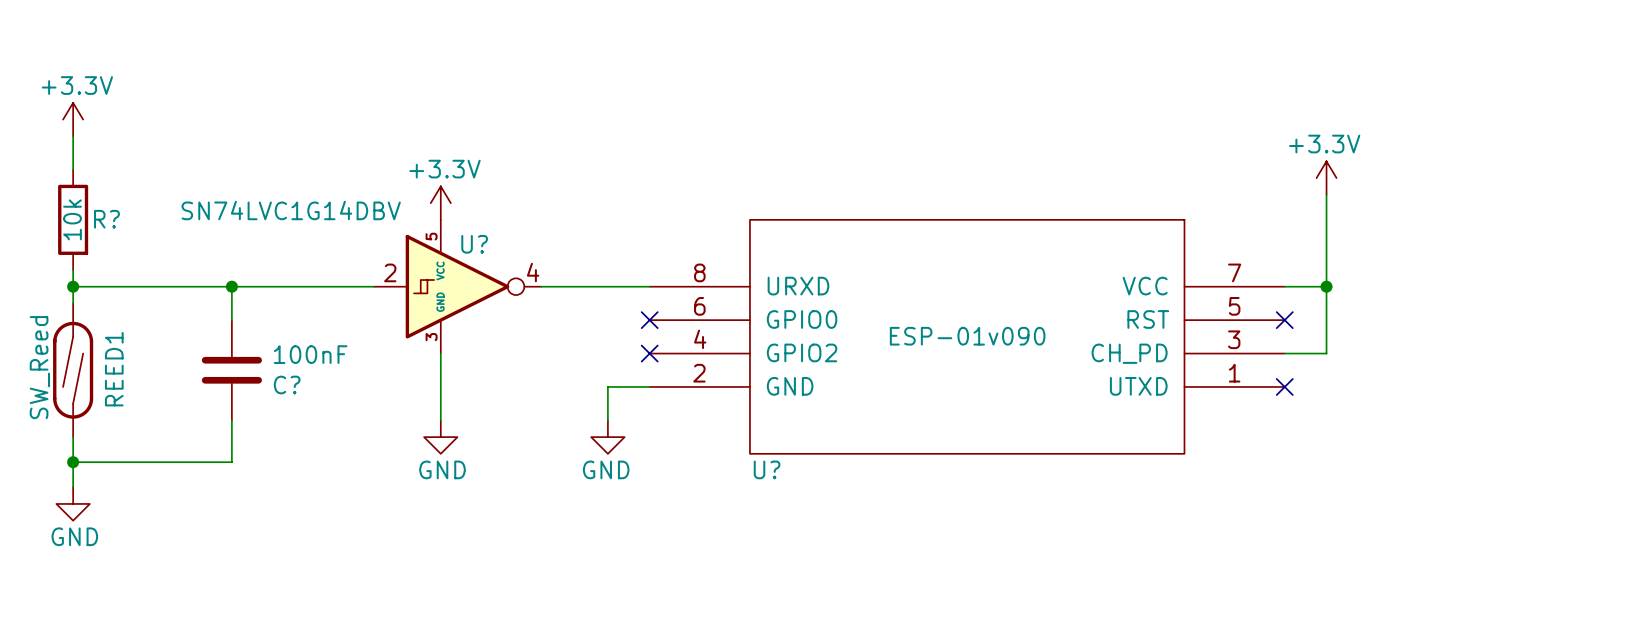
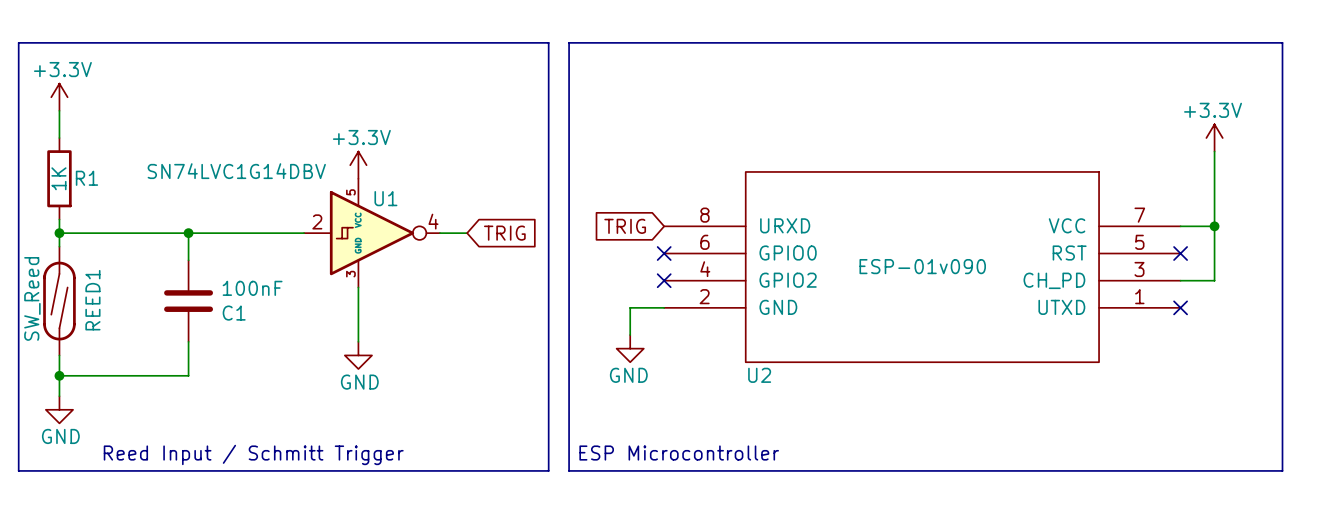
line: none -> (18, 42) (18, 470) (548, 470) (548, 42) (18, 42)
line: none -> (569, 42) (569, 470) (1282, 470) (1282, 42) (569, 42)
power symbol position: +3.3V (1326, 178) -> +3.3V (1214, 138)
wire: (1326, 194) (1326, 353) (1284, 353) -> (1214, 151) (1214, 280) (1180, 280)
R? value: 10k (72, 219) -> 1K (58, 178)
R? name: R? (106, 219) -> R1 (86, 178)
U? name: U? (474, 244) -> U1 (385, 198)
global label: none -> TRIG (625, 226)
junction: none -> (1214, 226)
wire: (574, 286) (649, 286) -> none
global label: none -> TRIG (504, 233)
wire: (1284, 286) (1326, 286) -> (1180, 226) (1214, 226)
junction: (1326, 286) -> none
no-connect mark: none -> (664, 253)
no-connect mark: none -> (1180, 253)
no-connect mark: (649, 320) -> none
no-connect mark: (1284, 320) -> none
U2: none -> ESP-01v090 (922, 267)
U?: ESP-01v090 (967, 336) -> none
no-connect mark: none -> (664, 280)
no-connect mark: (649, 353) -> none
no-connect mark: none -> (1180, 307)
C? name: C? (287, 385) -> C1 (234, 313)
wire: (649, 386) (607, 386) (607, 420) -> (664, 307) (630, 307) (630, 335)
no-connect mark: (1284, 386) -> none
power symbol position: GND (607, 437) -> GND (630, 348)
text: none -> ESP Microcontroller (679, 453)
text: none -> Reed Input / Schmitt Trigger (253, 454)

